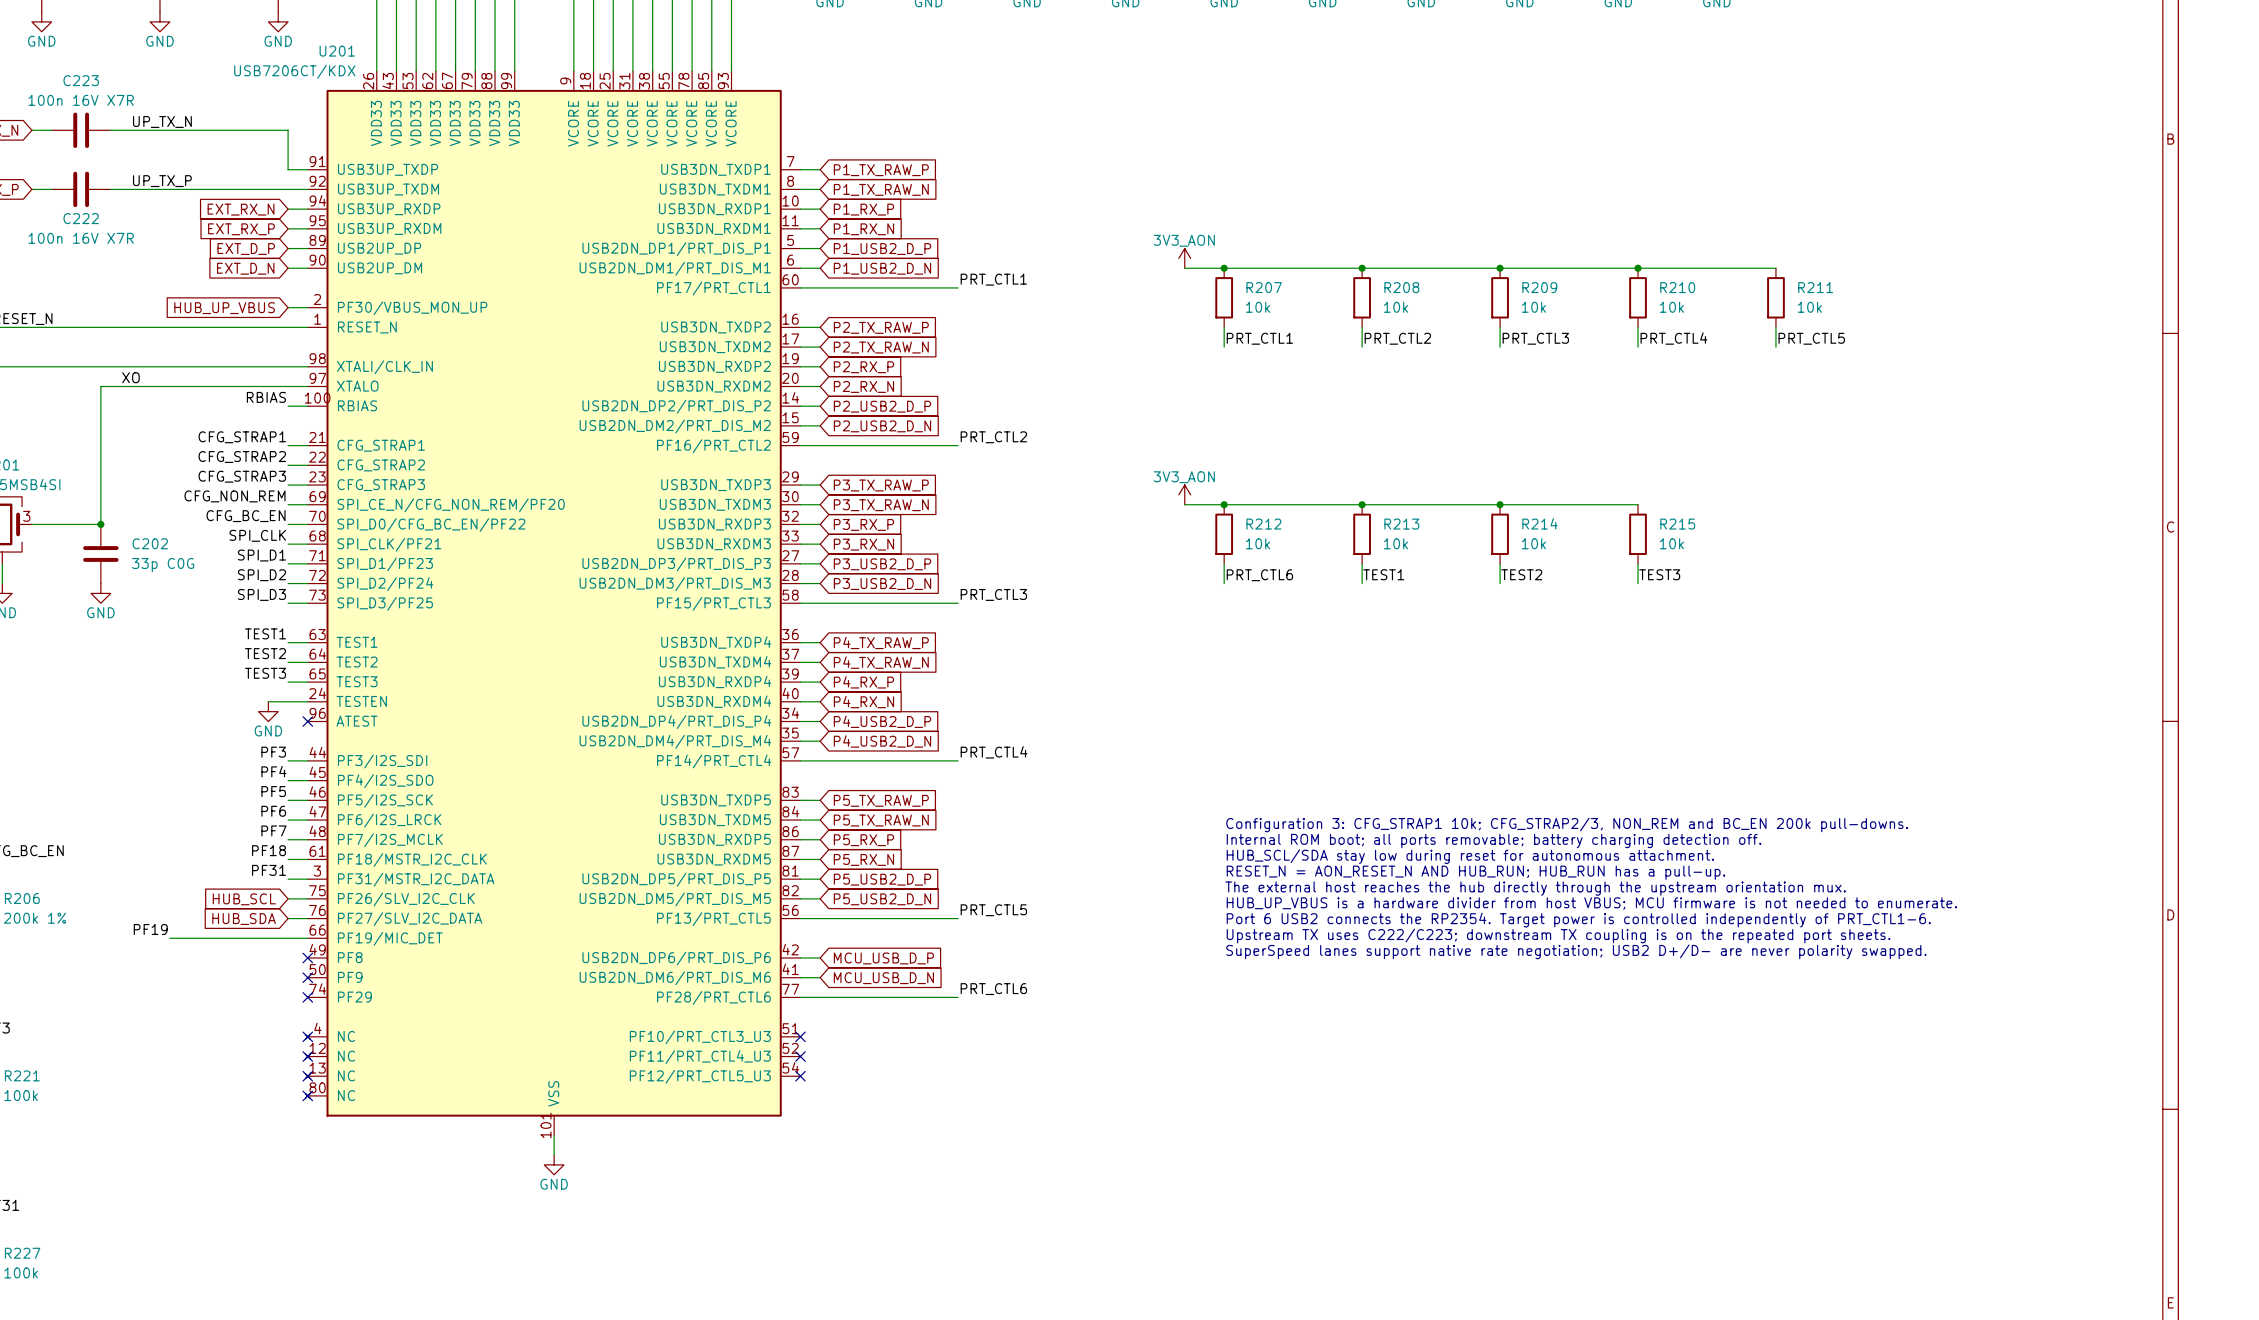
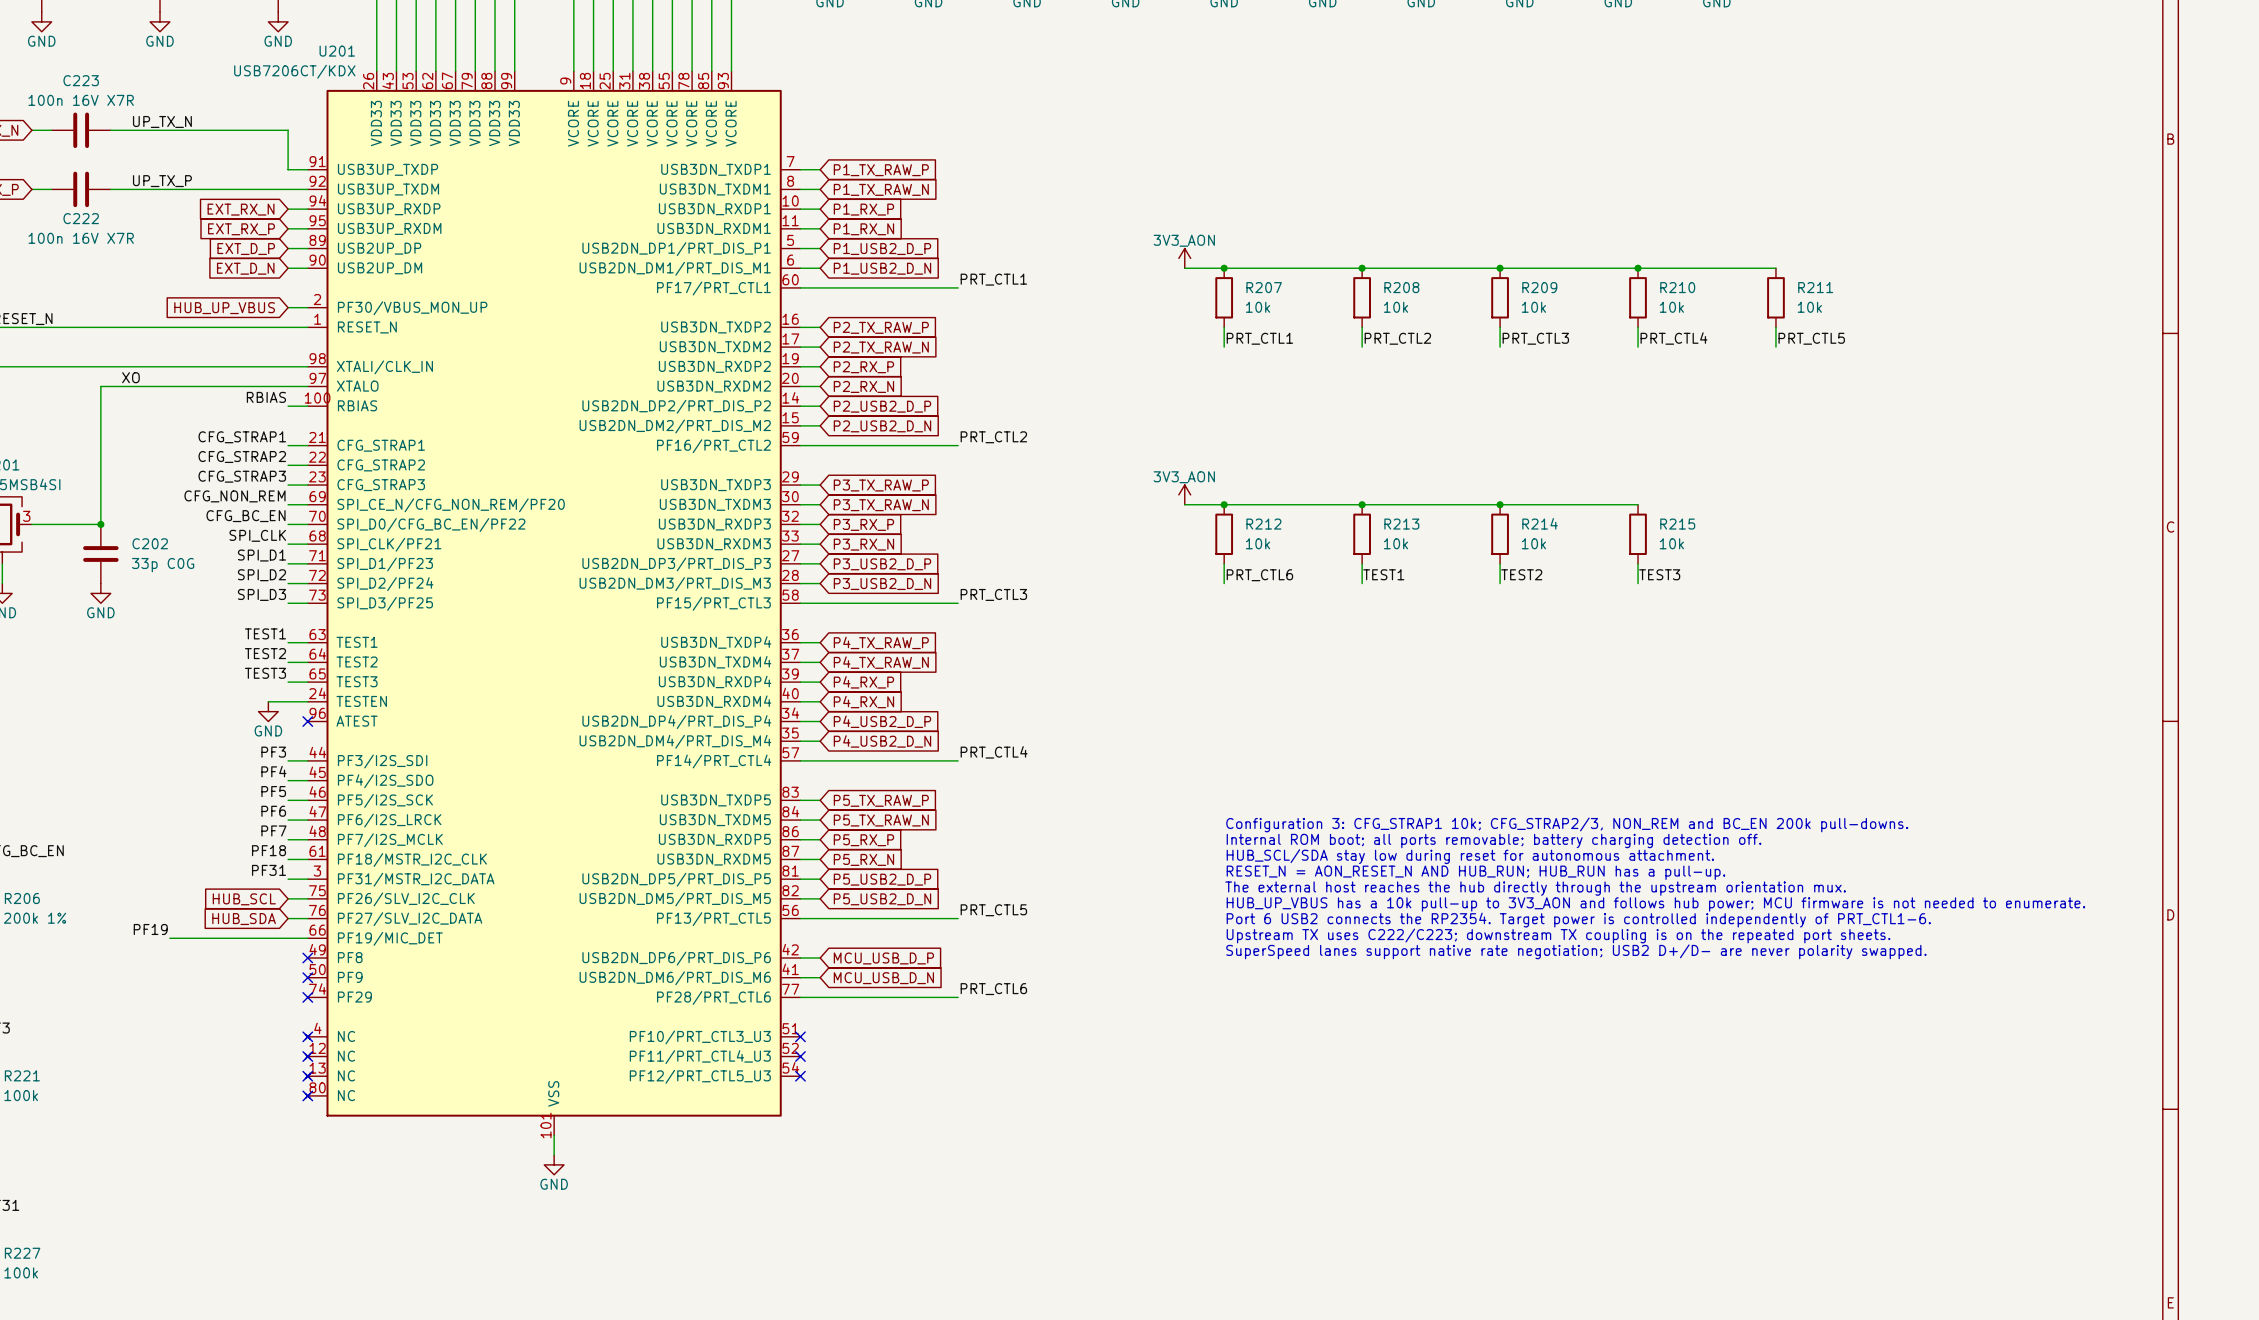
text: HUB_UP_VBUS is a hardware divider from host VBUS; MCU firmware is not needed to enumerate. (1591, 903) -> HUB_UP_VBUS has a 10k pull-up to 3V3_AON and follows hub power; MCU firmware is not needed to enumerate. (1655, 904)

